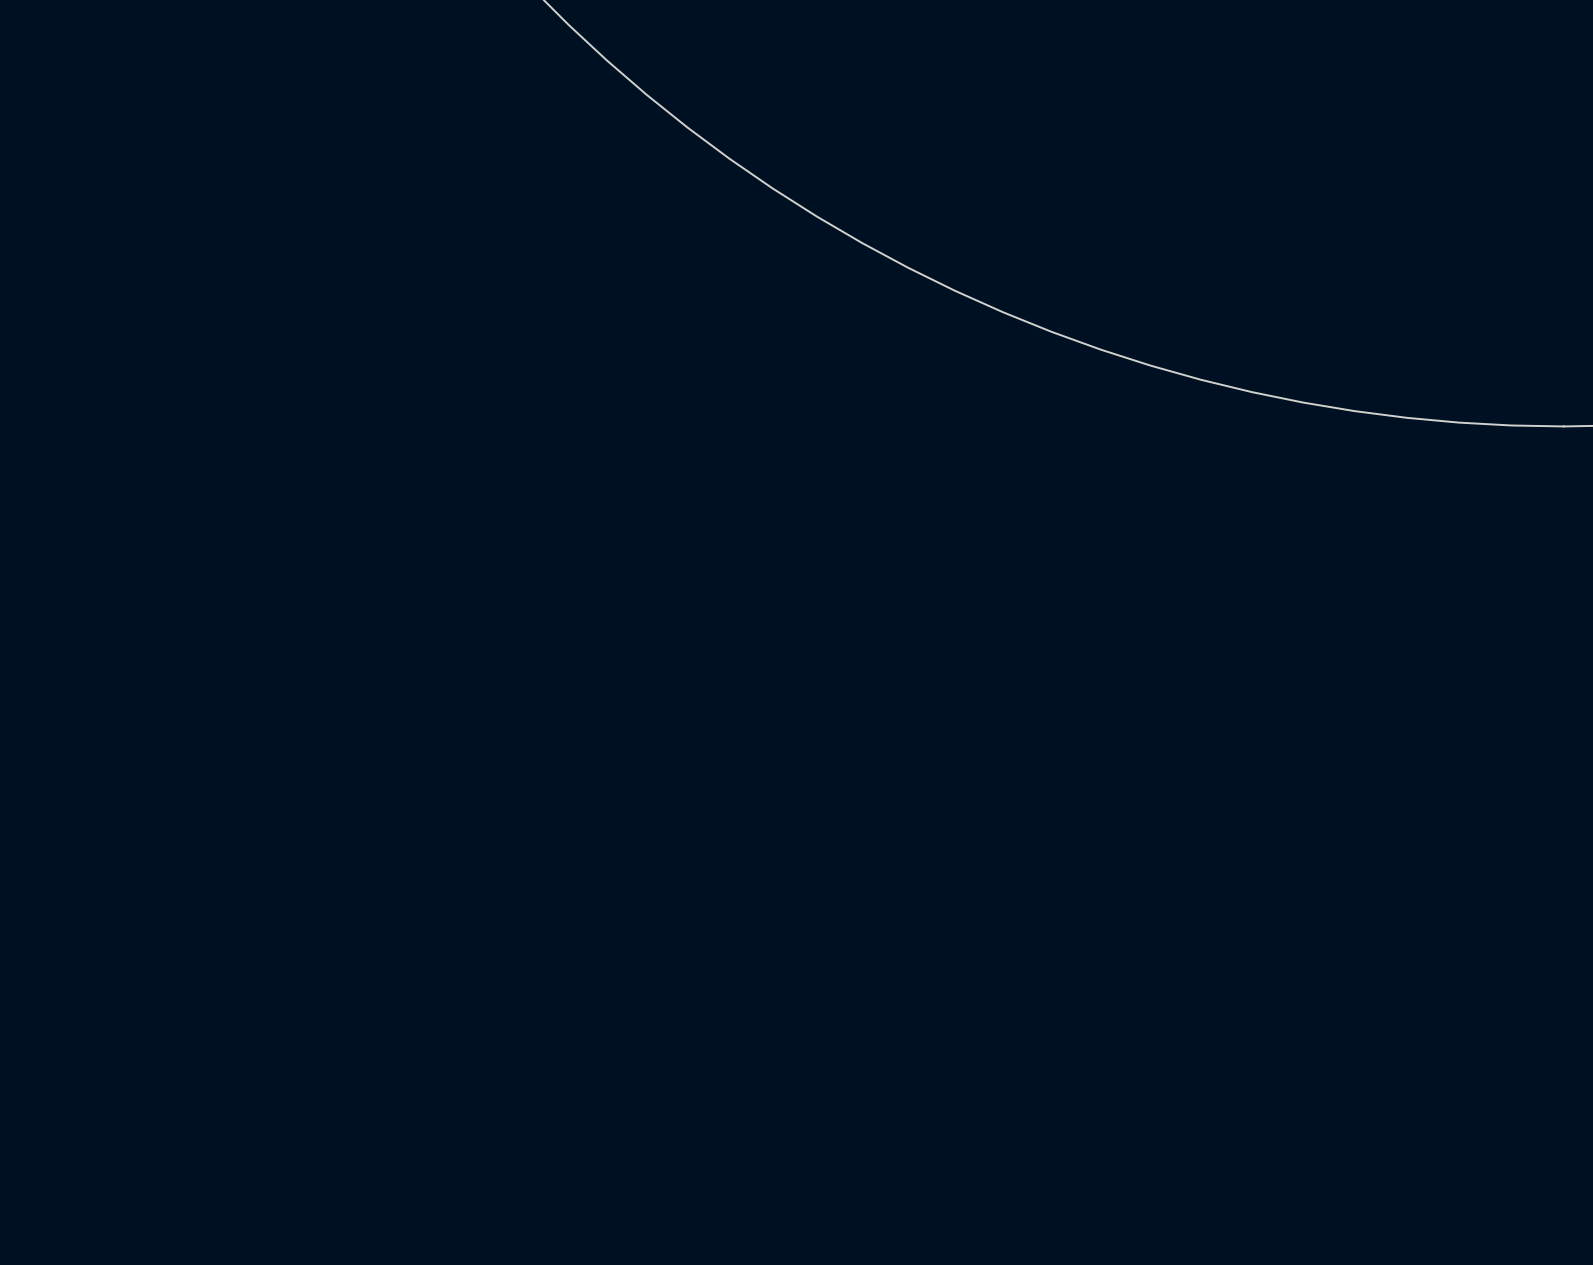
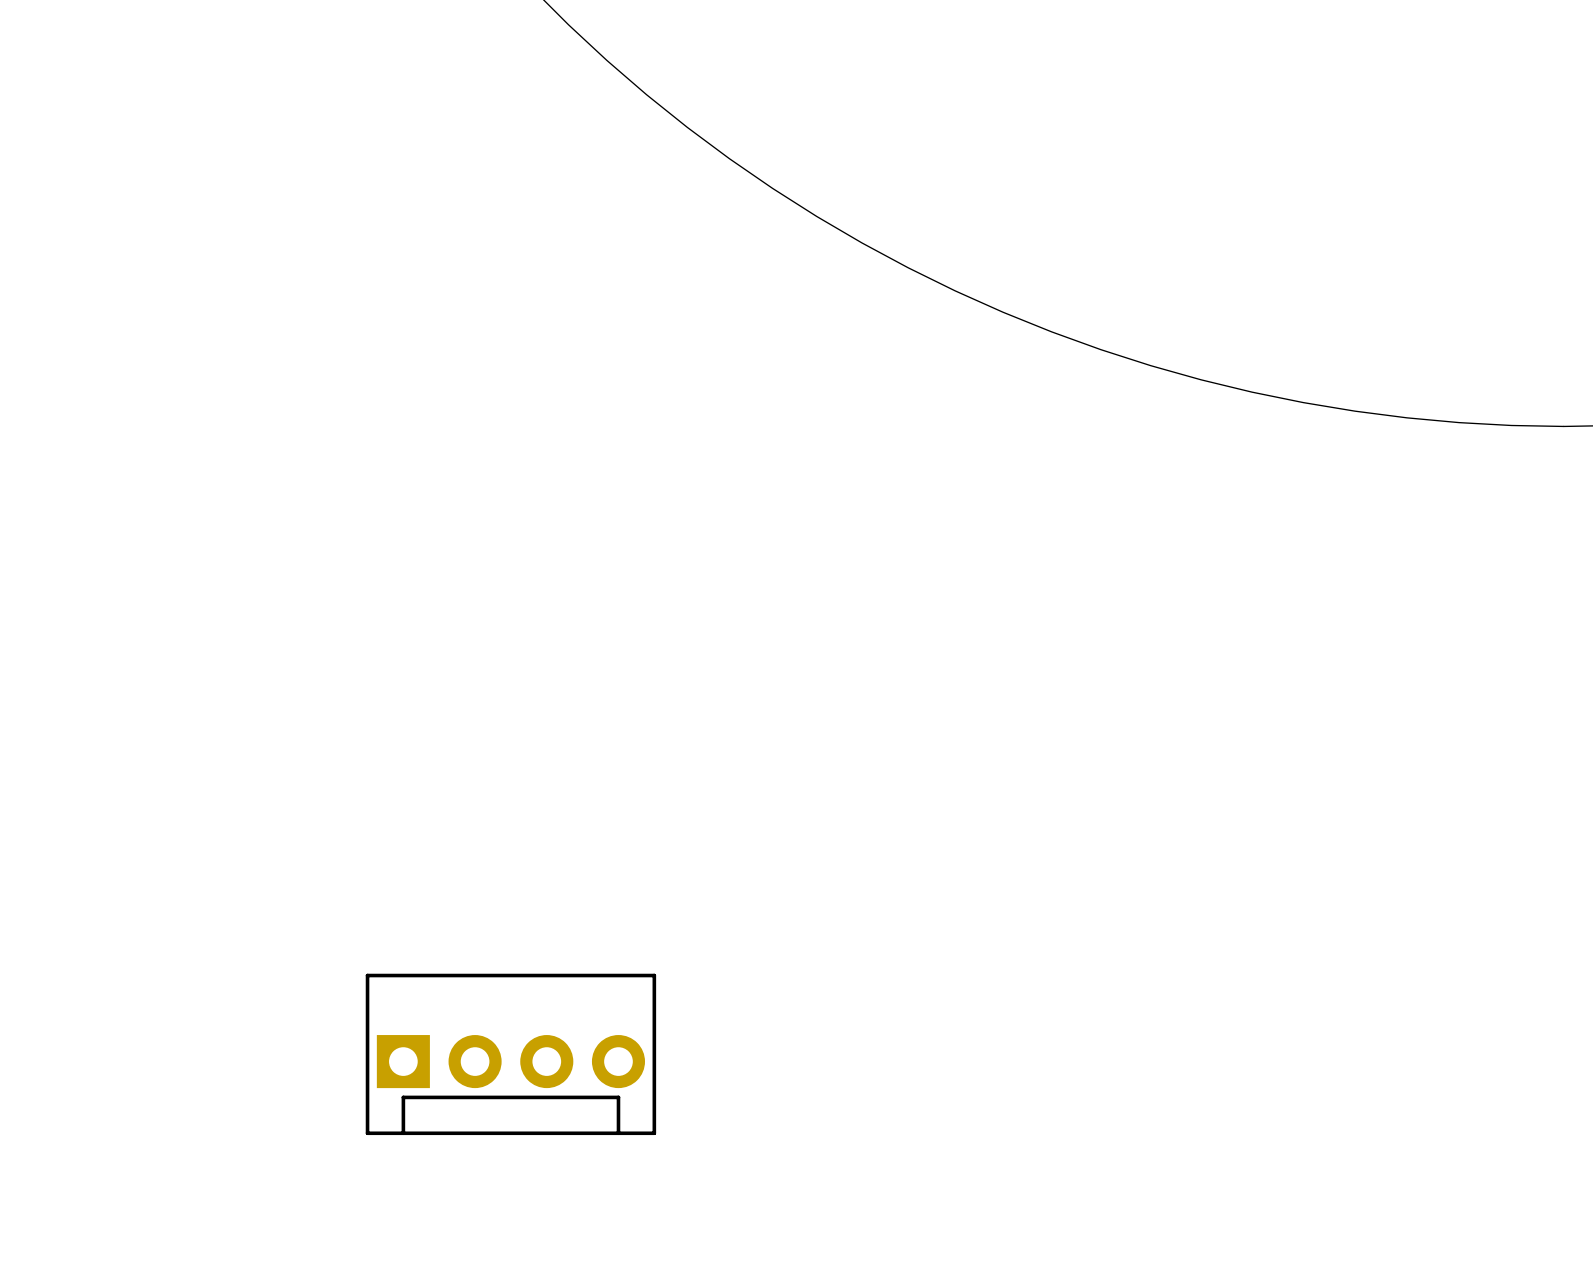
part: none -> (510, 1054)

